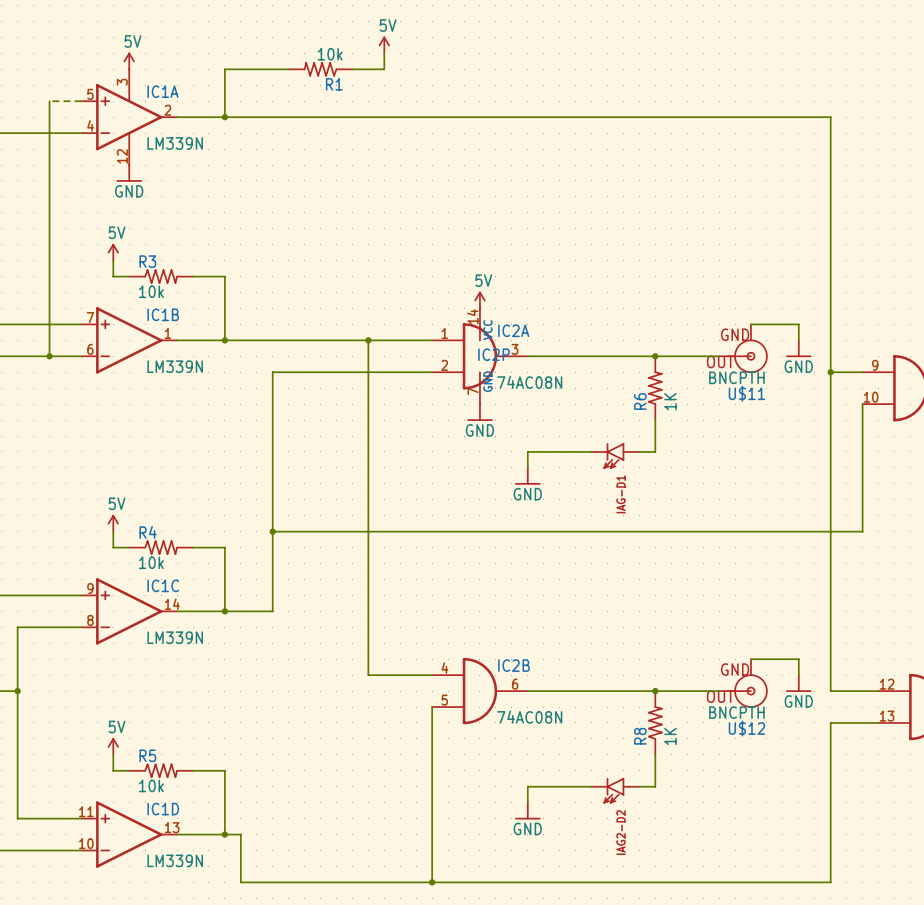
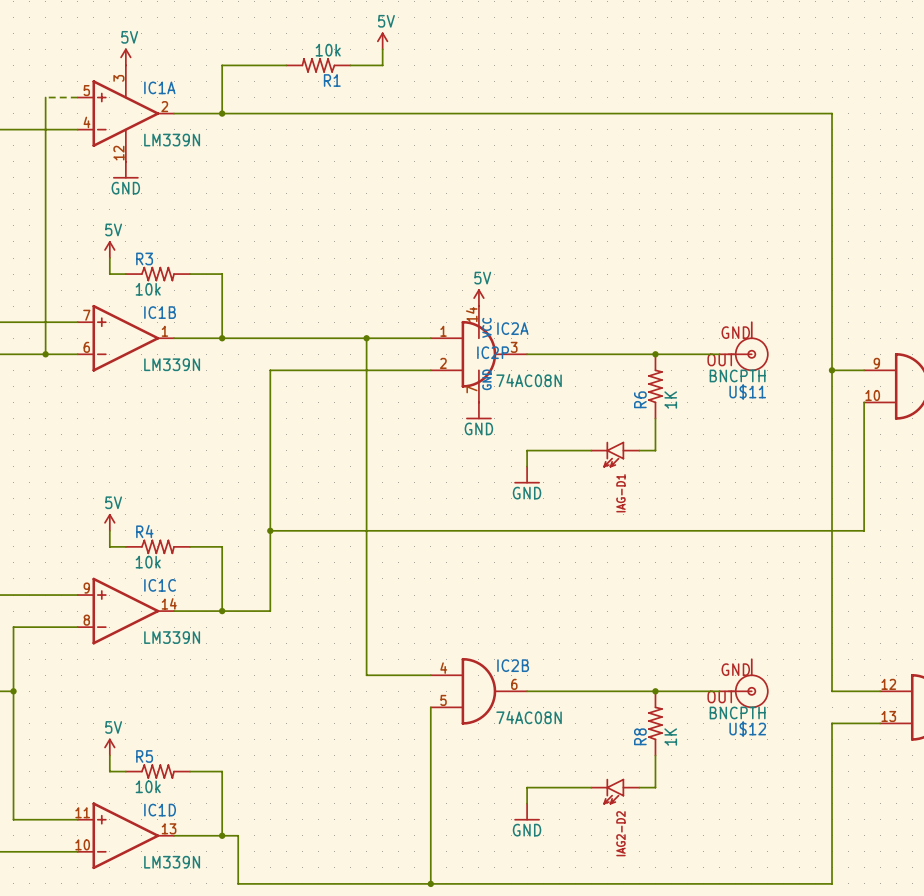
wire: (750, 324) (798, 324) (798, 340) -> none
power symbol: GND (798, 348) -> none
wire: (750, 659) (798, 659) (798, 675) -> none
power symbol: GND (798, 683) -> none

